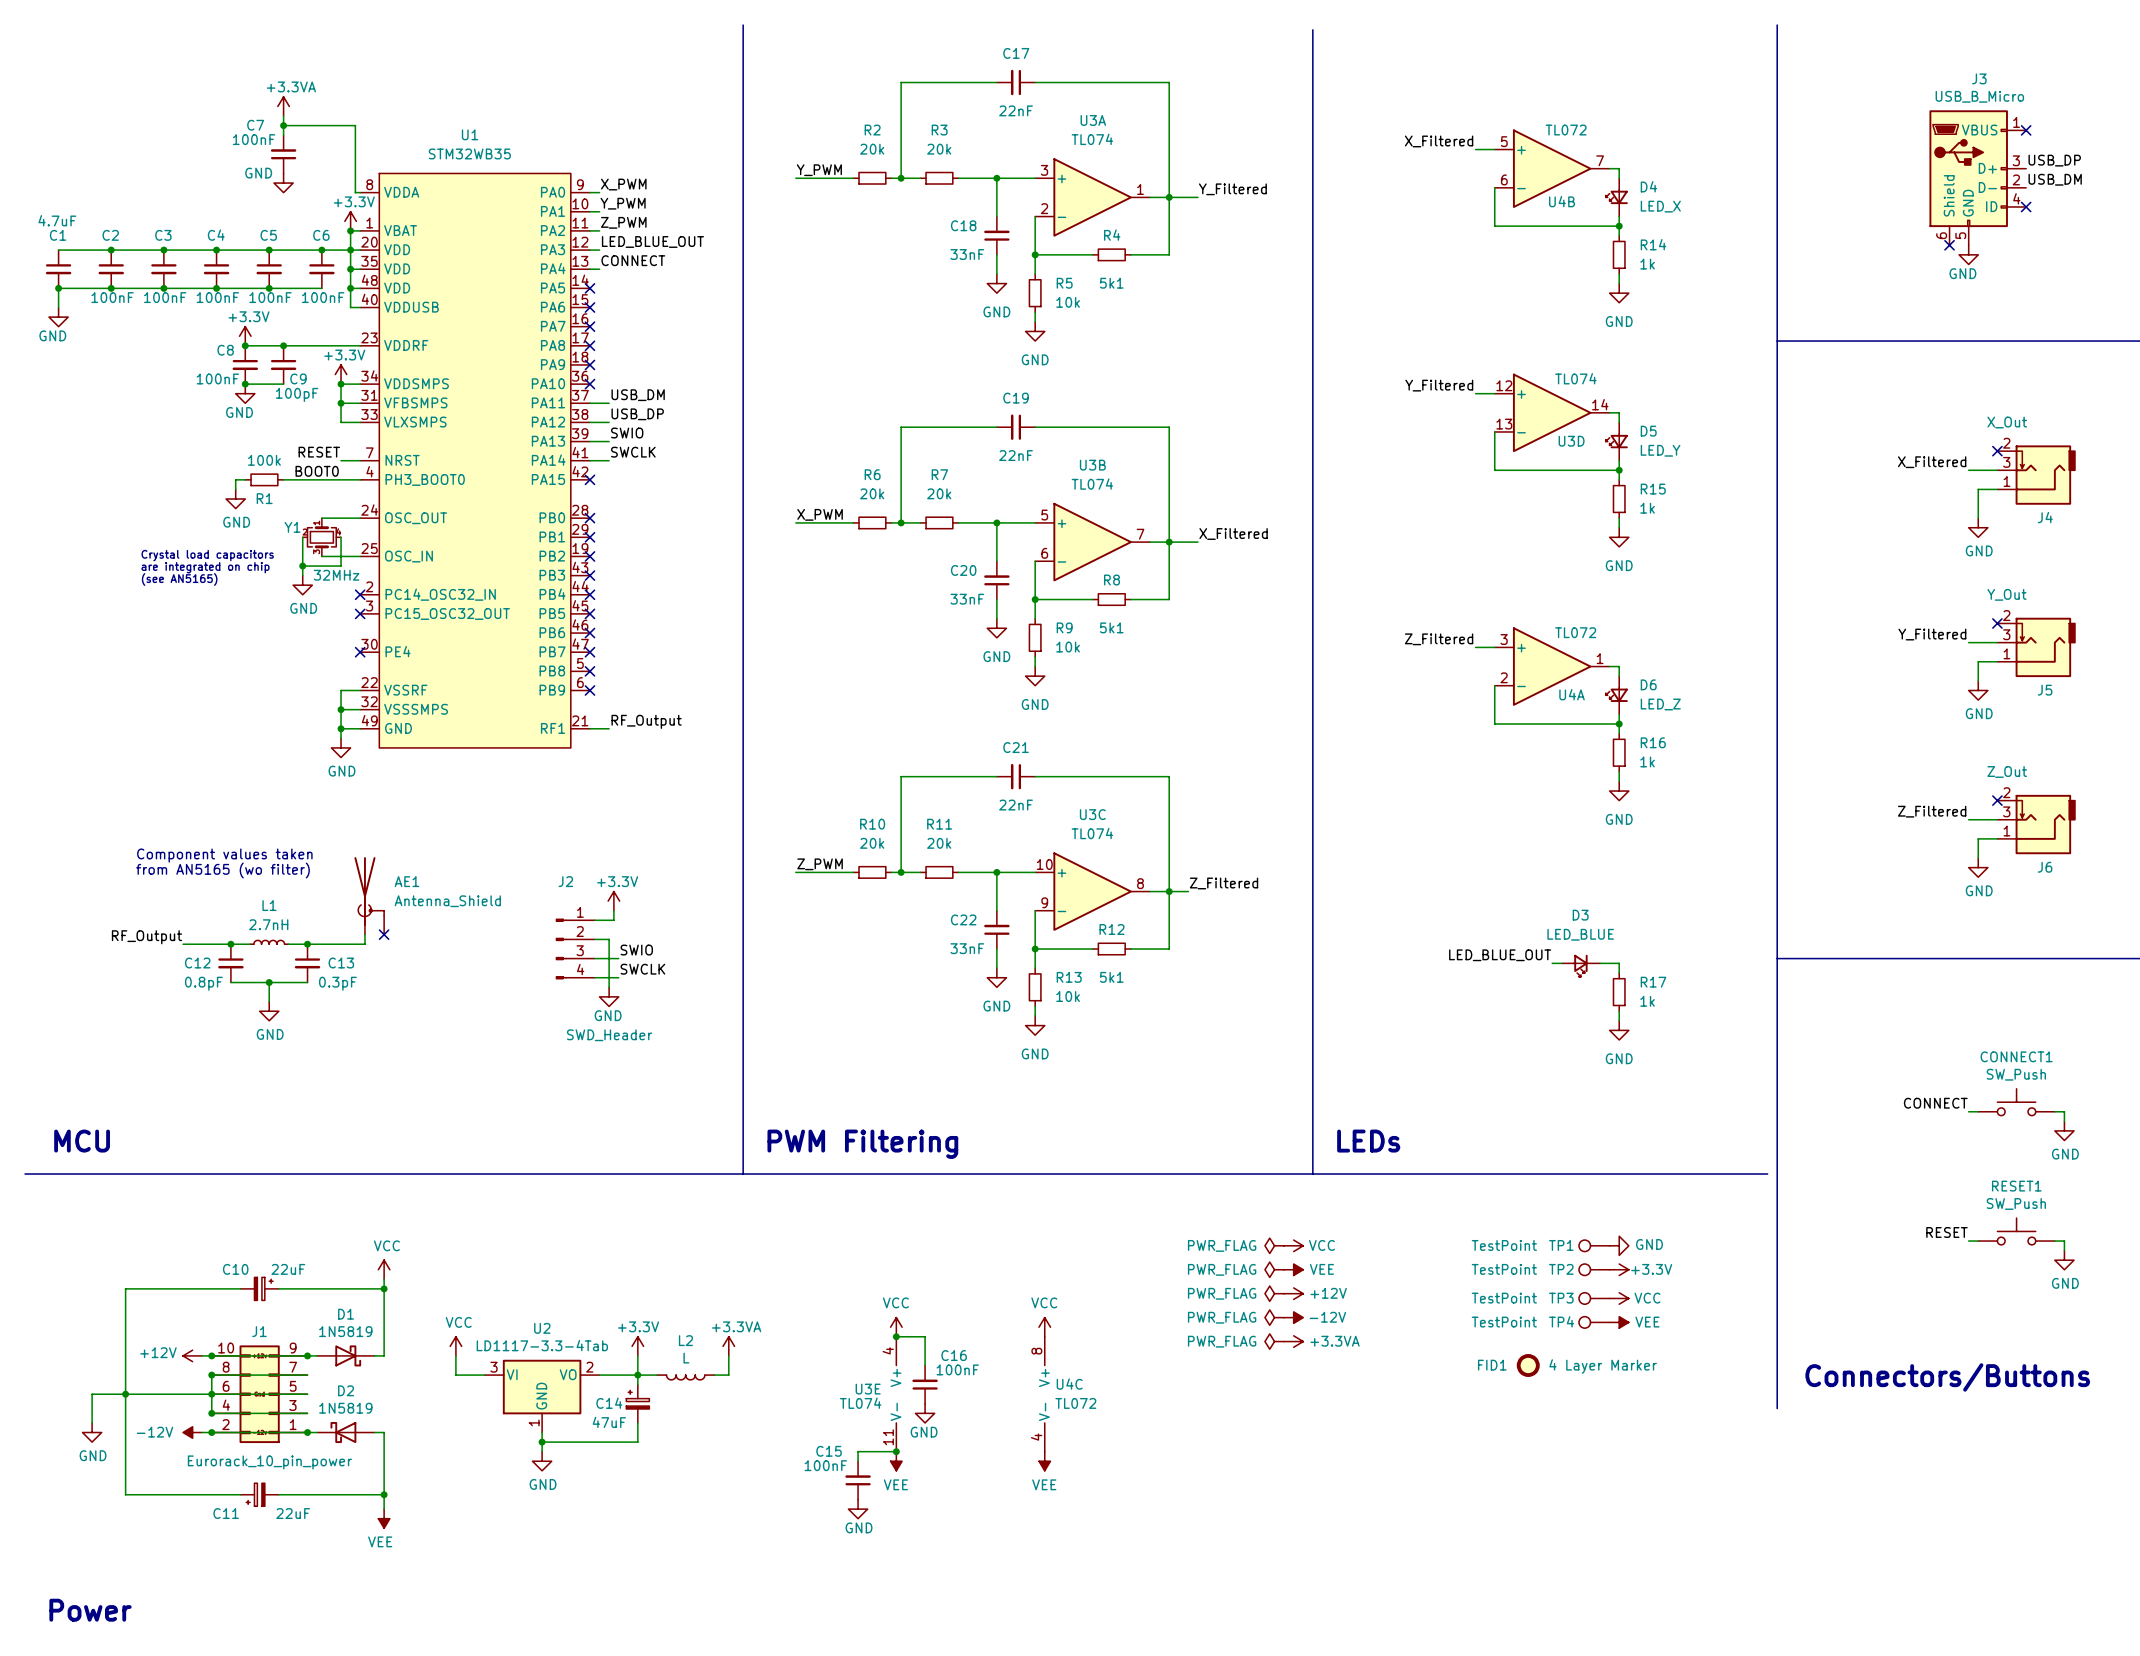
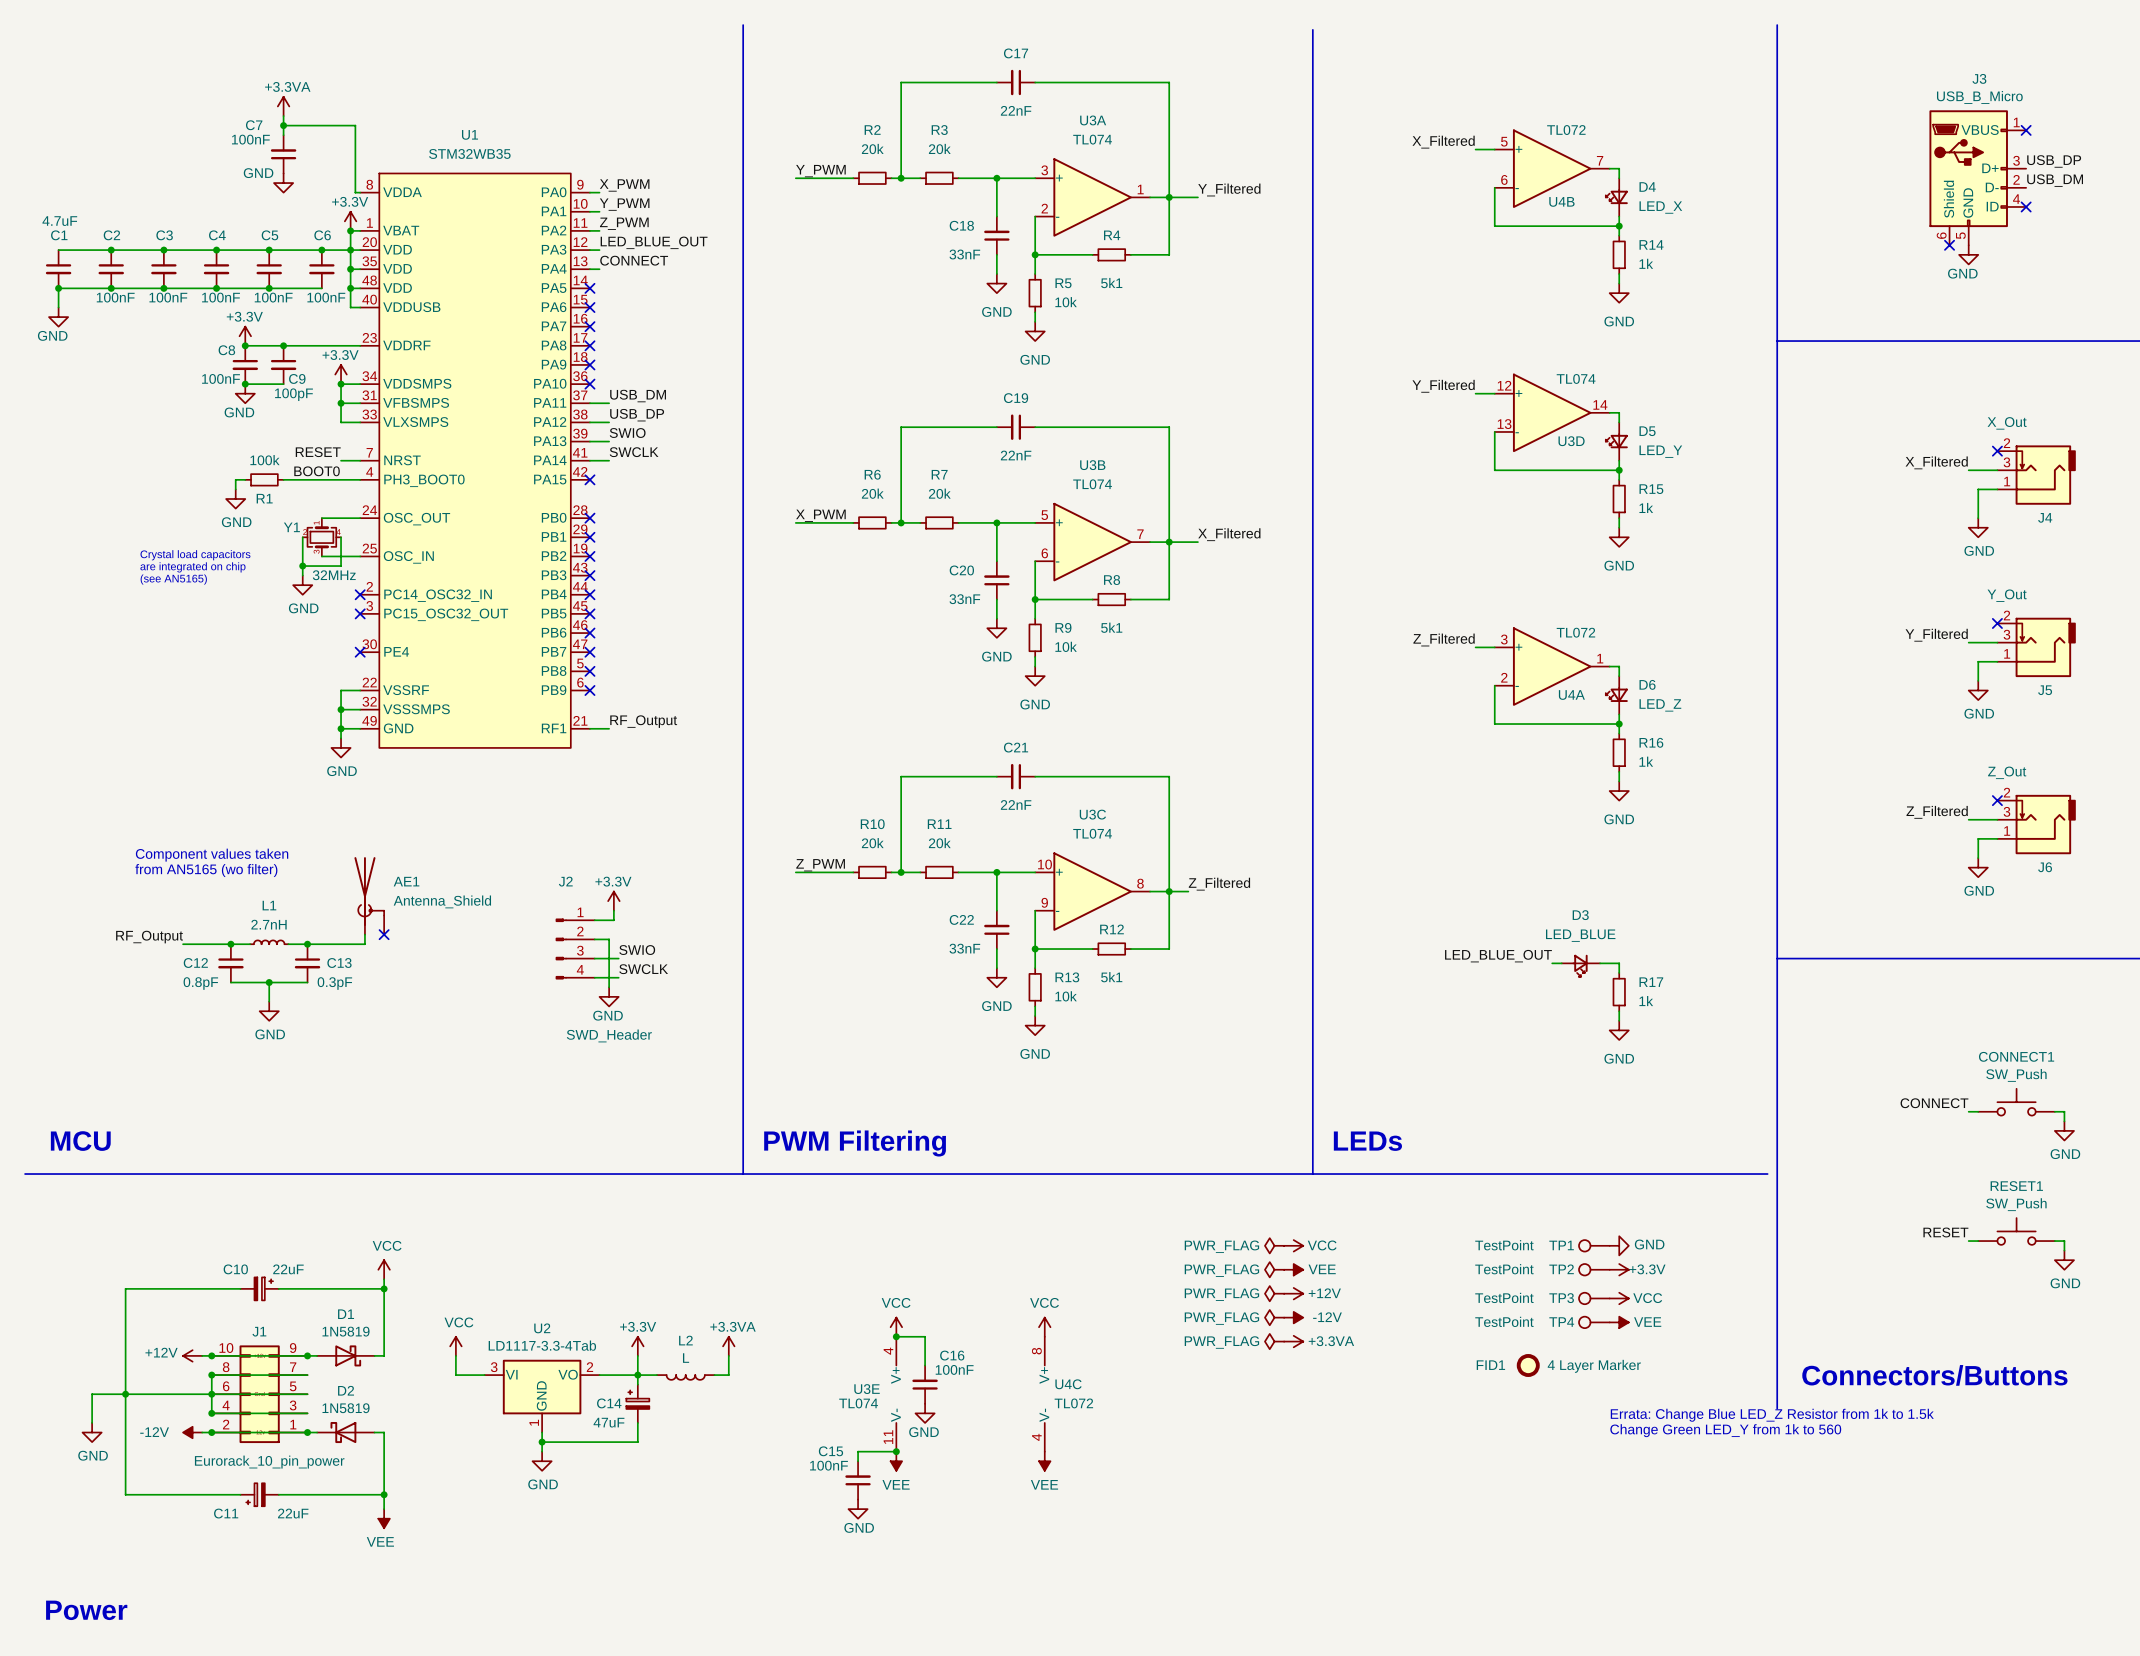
text: none -> Errata: Change Blue LED_Z Resistor from 1k to 1.5k (1772, 1415)
text: none -> Change Green LED_Y from 1k to 560 (1725, 1430)

